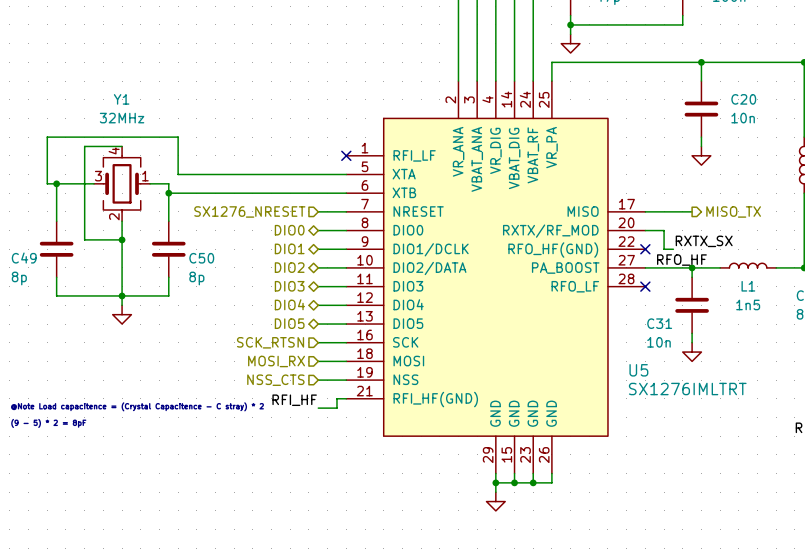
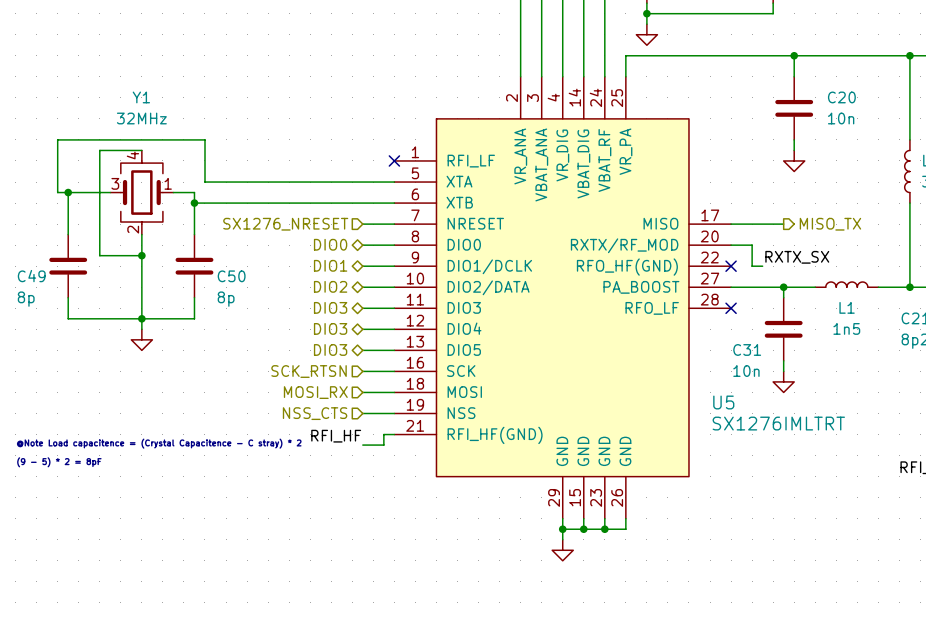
label: RFO_HF (681, 260) -> none
hierarchical label: DIO4 (289, 304) -> DIO3 (330, 328)
hierarchical label: DIO5 (289, 323) -> DIO3 (330, 349)

